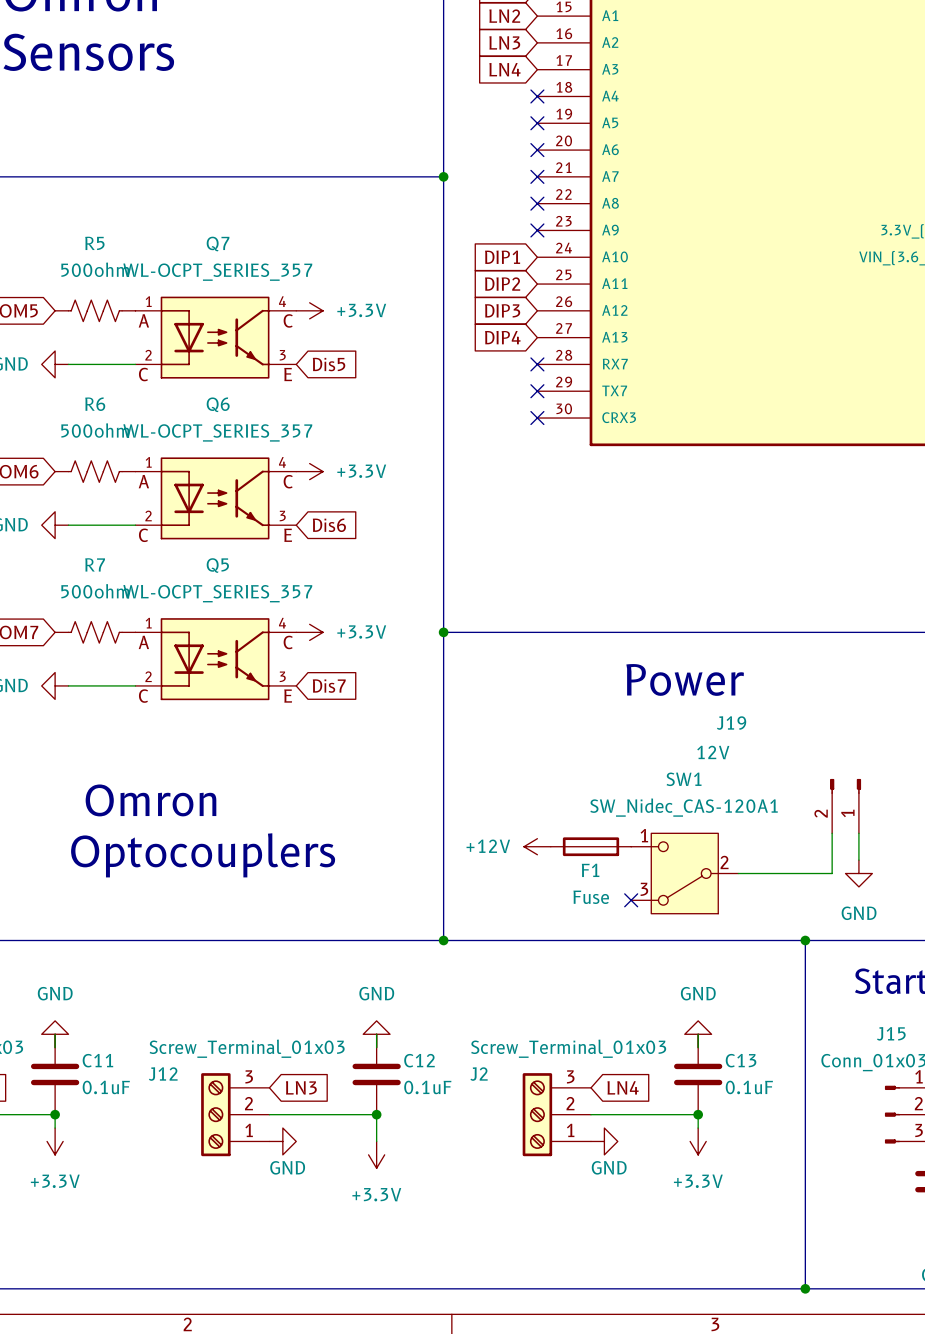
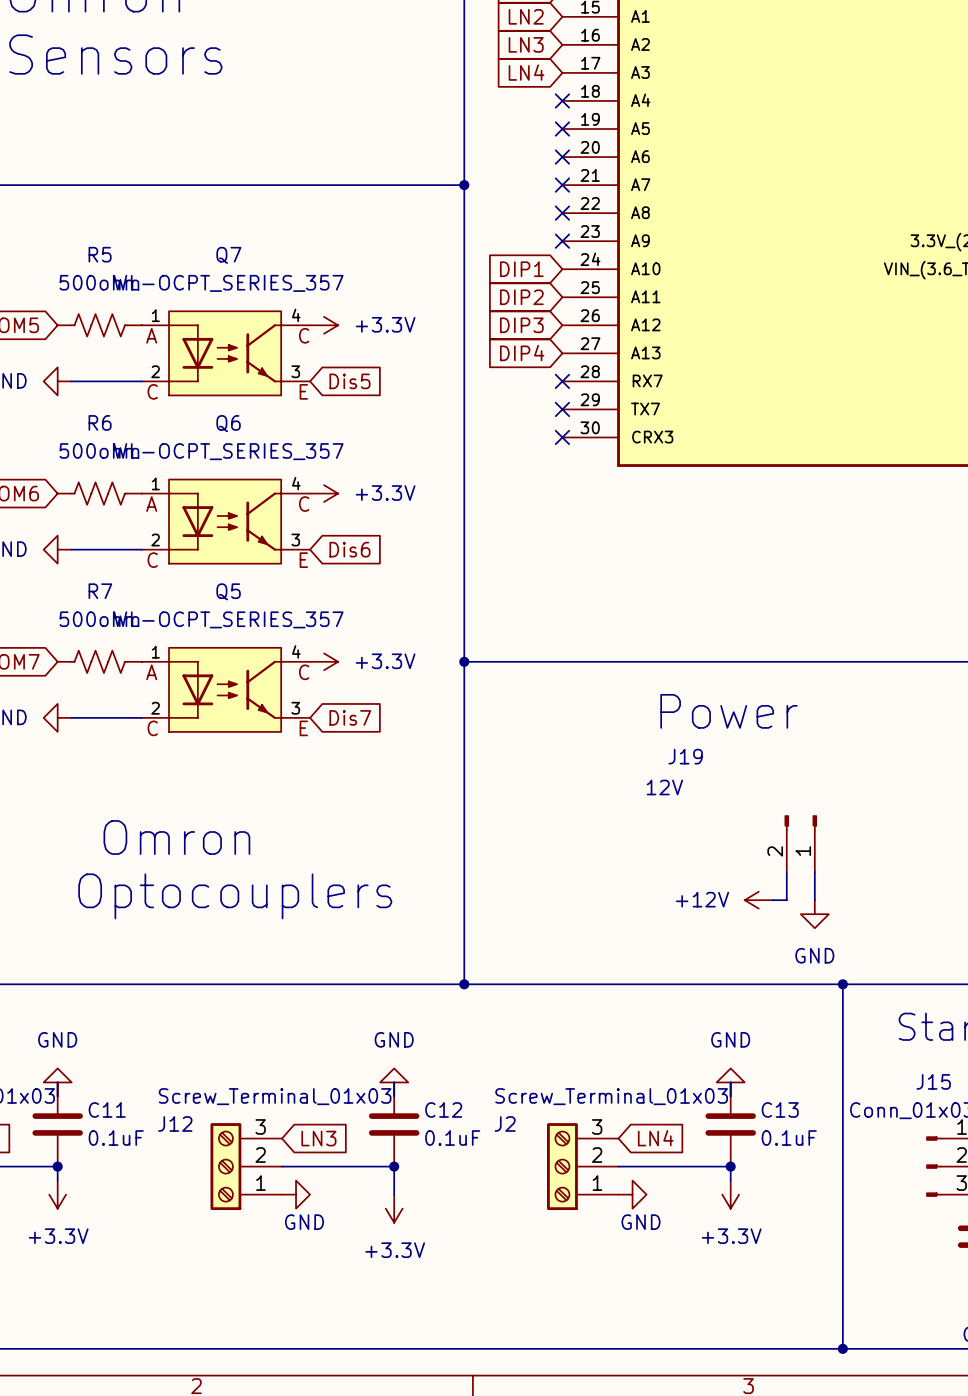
J19 position: (845, 806) -> (800, 843)
wire: none -> (786, 872) (786, 900) (772, 900)
wire: (832, 833) (832, 873) (738, 873) -> none
wire: (858, 833) (858, 860) -> (814, 872) (814, 900)
power symbol position: +12V (537, 846) -> +12V (758, 900)
F1: Fuse (590, 846) -> none
SW1: SW_Nidec_CAS-120A1 (684, 873) -> none
power symbol position: GND (858, 873) -> GND (814, 914)
no-connect mark: (631, 900) -> none

